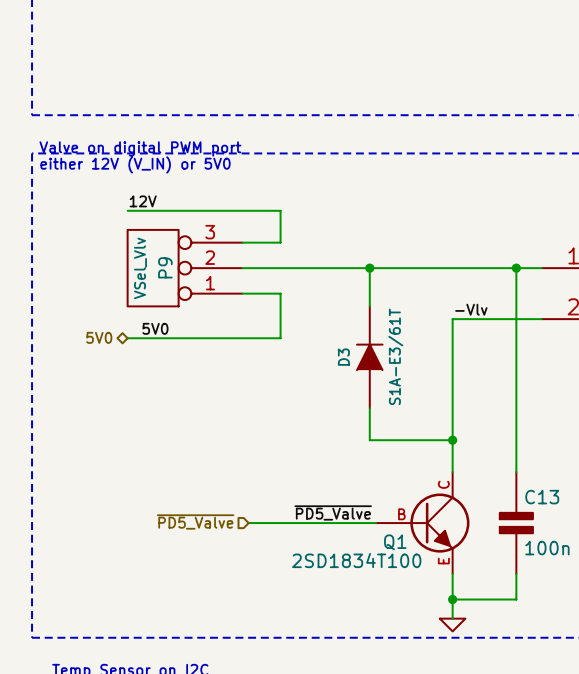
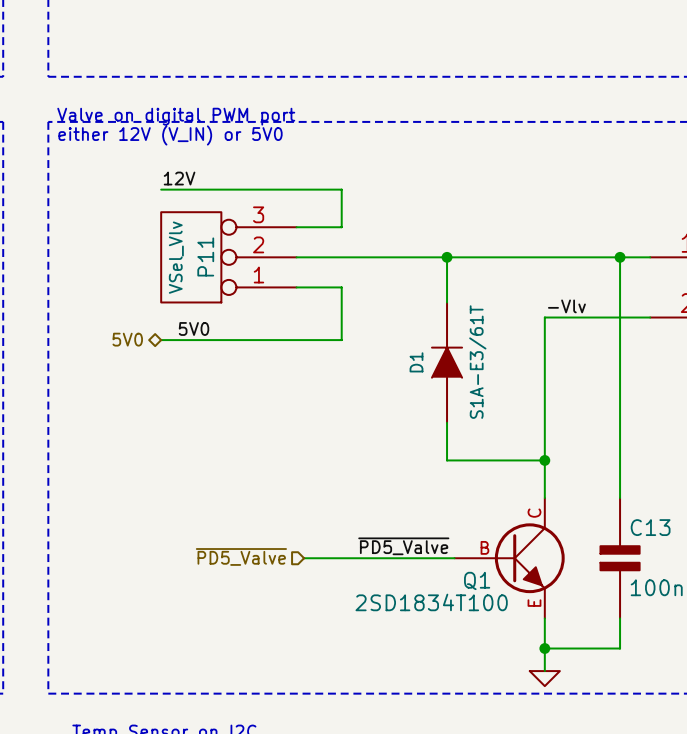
P9 name: P9 (165, 267) -> P11 (205, 256)
D3 name: D3 (343, 357) -> D1 (416, 362)

